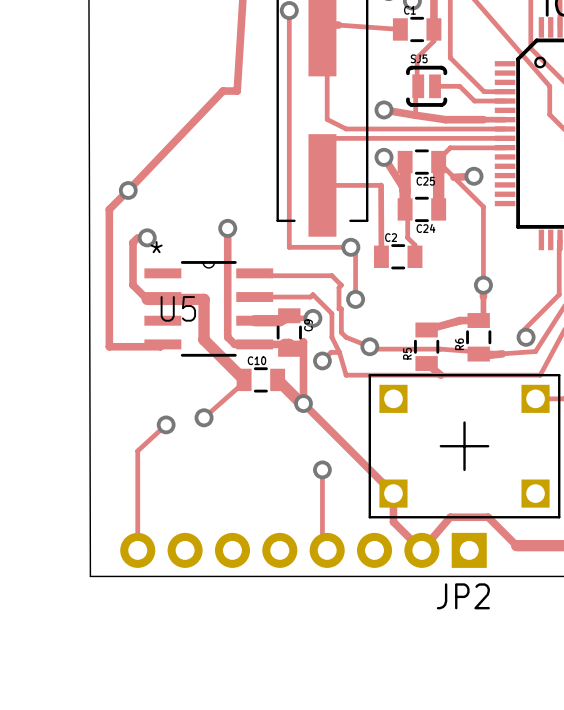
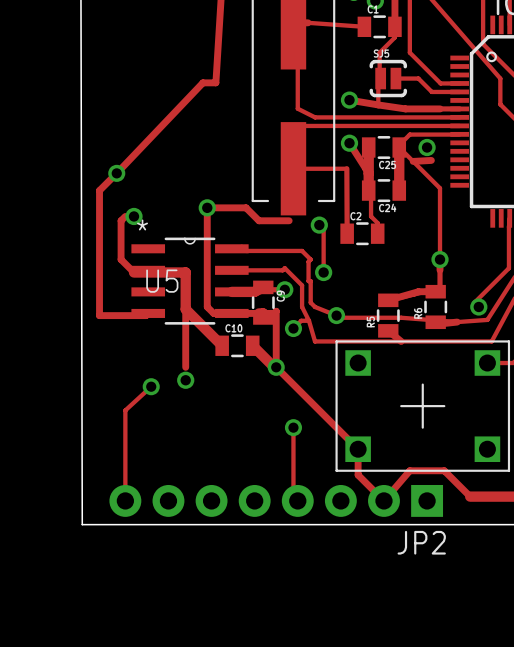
track: (289, 10) (289, 247) (350, 247) -> none
via: (289, 10) -> none
via position: (473, 176) -> (427, 147)
track: none -> (207, 207) (246, 207) (258, 220) (289, 220)
track: none -> (185, 309) (185, 367)
track: (244, 379) (244, 382) (204, 417) -> none

